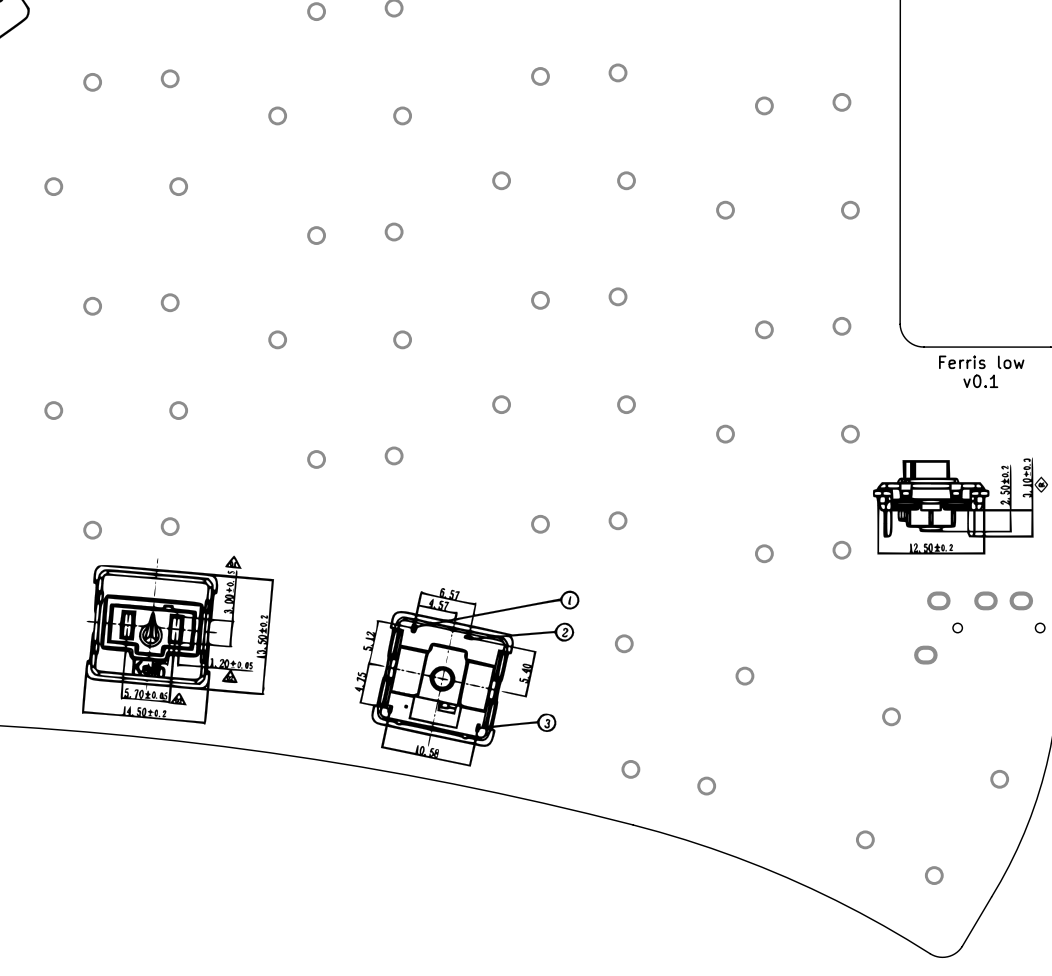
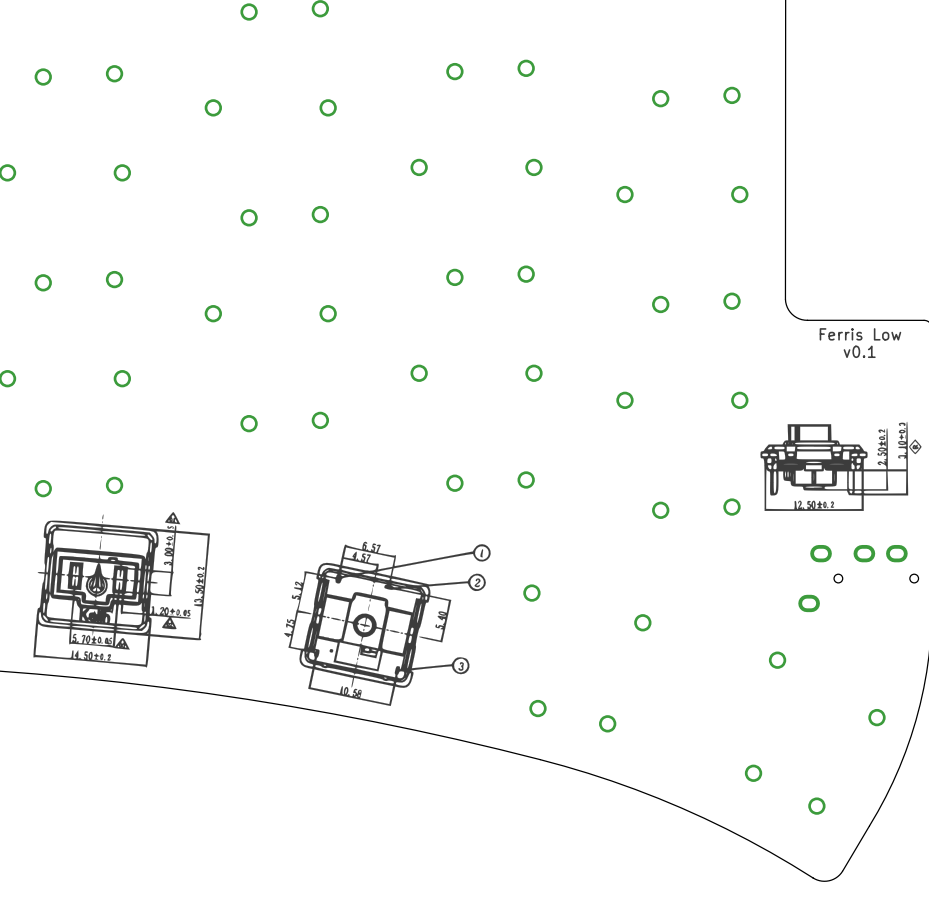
text: Ferris low (981, 362) -> Ferris Low (860, 334)

